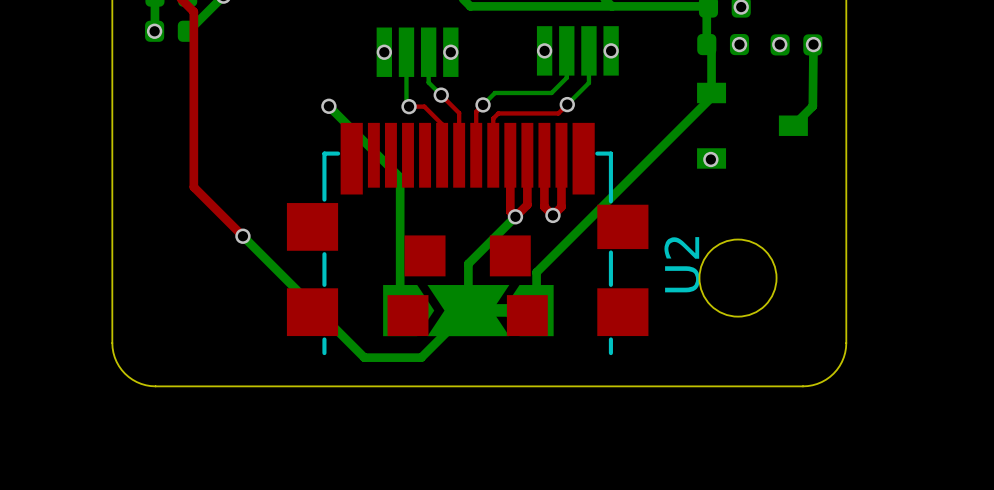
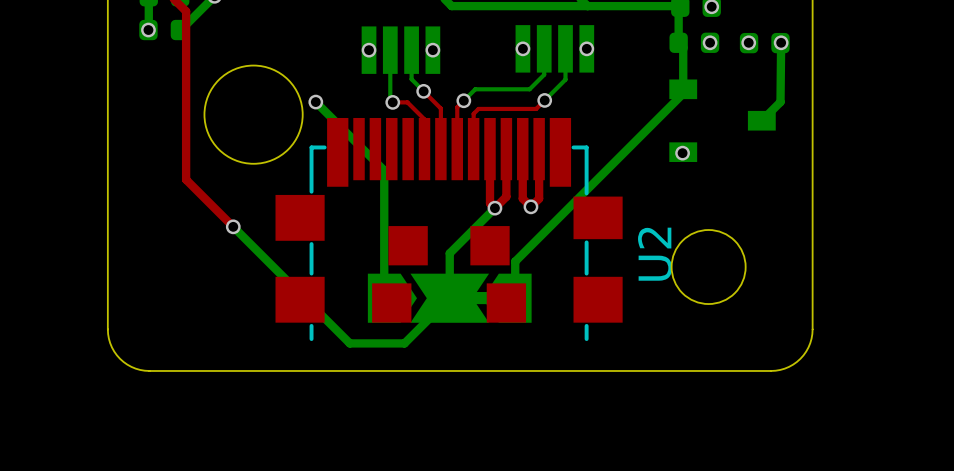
round board edge: none -> [203, 64, 304, 165]

